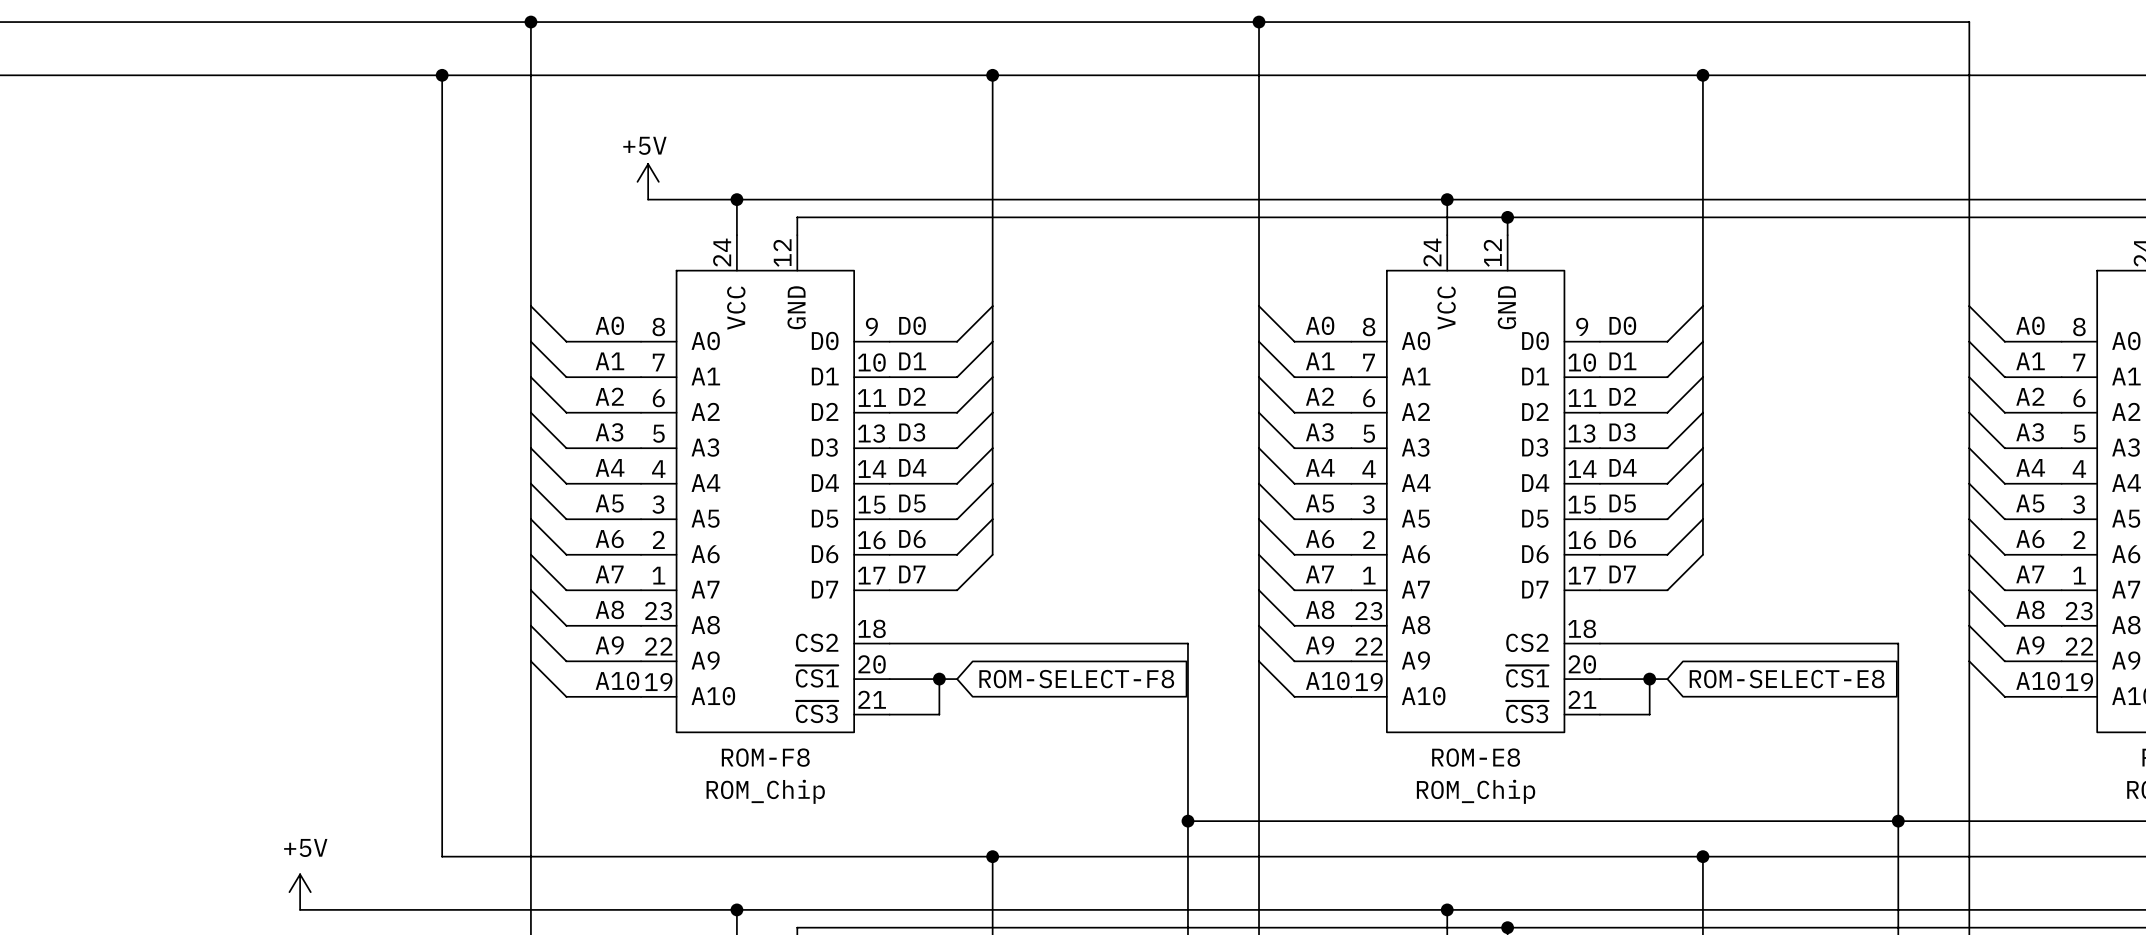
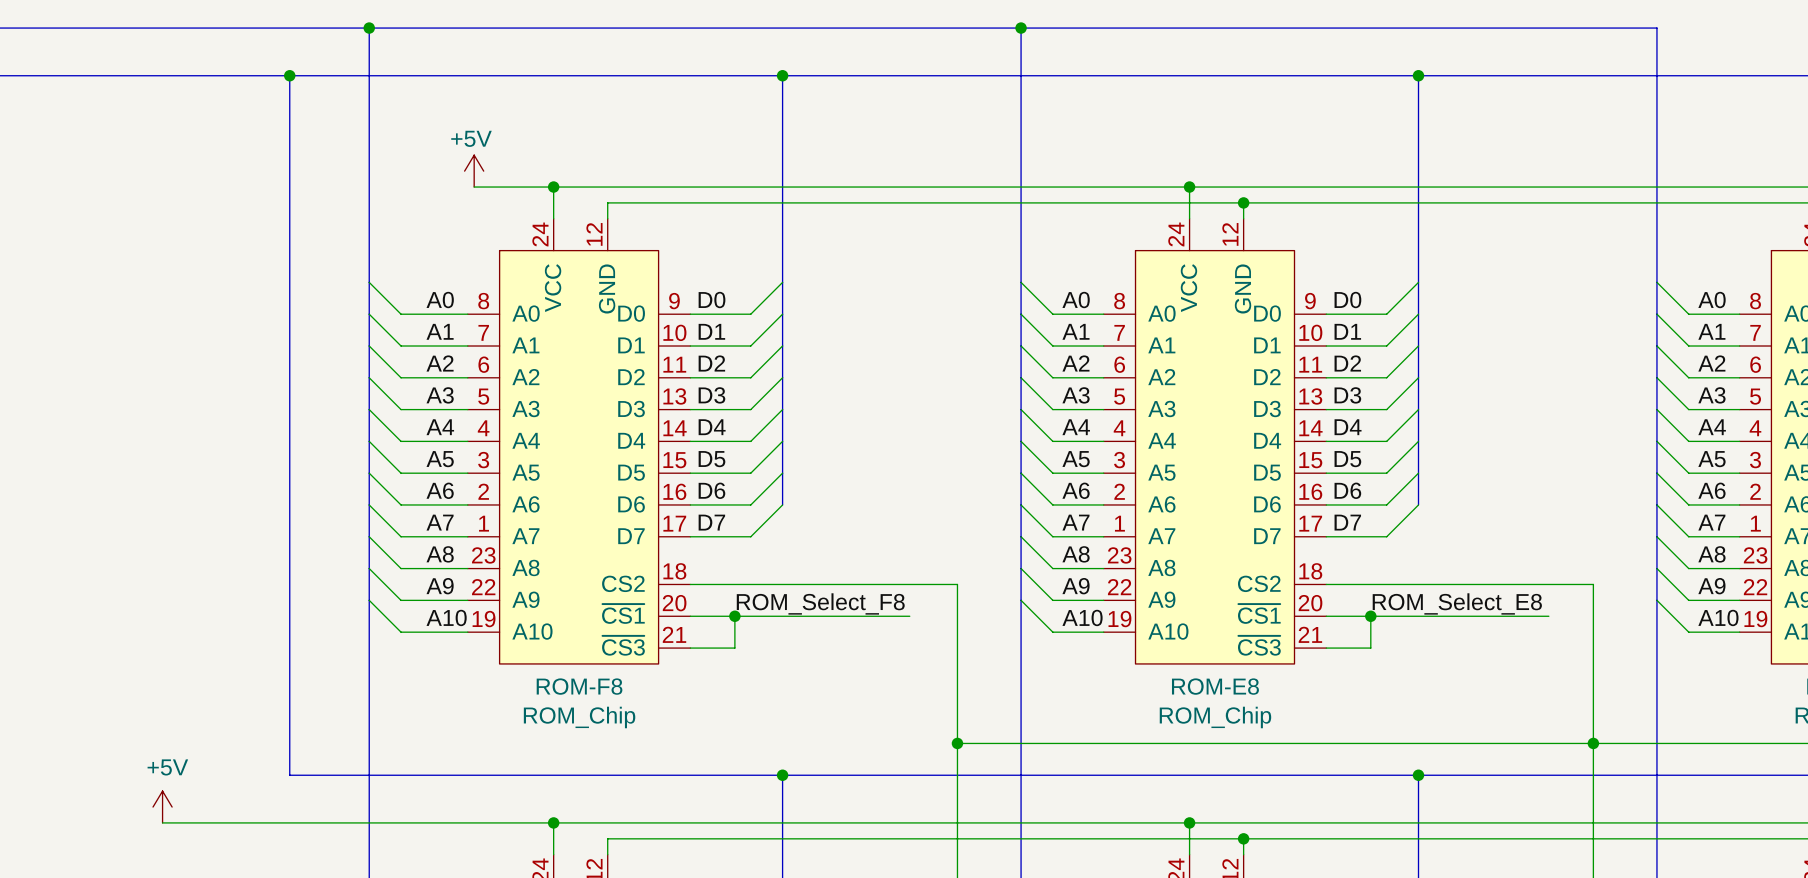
label: none -> ROM_Select_F8 (820, 603)
label: none -> ROM_Select_E8 (1457, 603)
wire: none -> (750, 616) (909, 616)
global label: ROM-SELECT-F8 (1076, 679) -> none
wire: none -> (1386, 616) (1548, 616)
global label: ROM-SELECT-E8 (1787, 679) -> none

